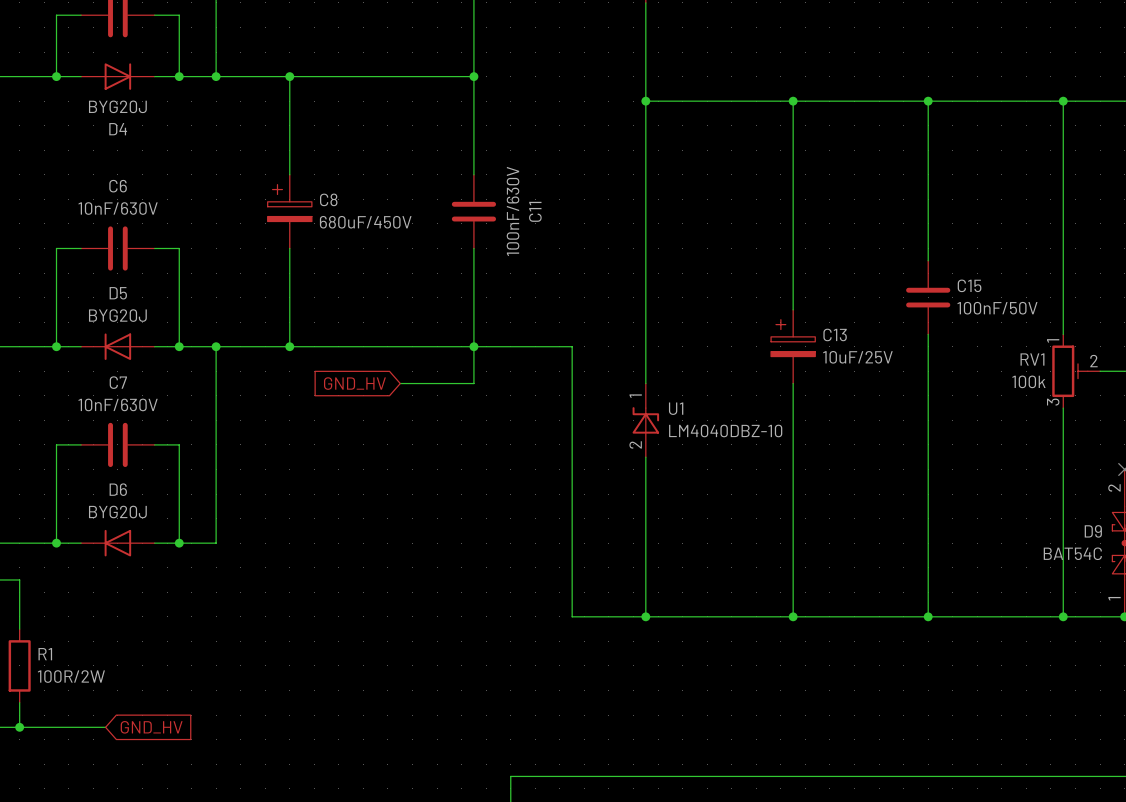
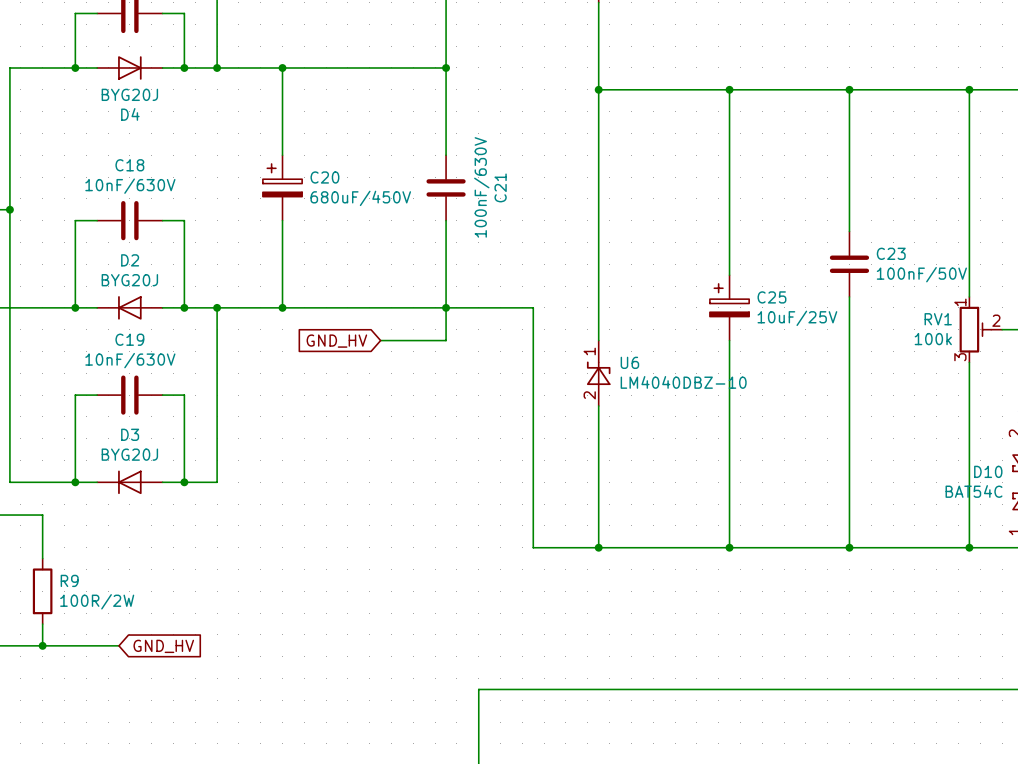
C6 name: C6 (118, 186) -> C18 (129, 165)
C8 name: C8 (328, 199) -> C20 (324, 177)
C11 name: C11 (535, 211) -> C21 (500, 187)
C15 name: C15 (969, 285) -> C23 (891, 253)
D5 name: D5 (118, 293) -> D2 (130, 260)
C13 name: C13 (835, 334) -> C25 (771, 297)
C7 name: C7 (118, 382) -> C19 (129, 339)
U1 name: U1 (676, 408) -> U6 (629, 362)
D6 name: D6 (118, 489) -> D3 (130, 434)
D9 name: D9 (1093, 531) -> D10 (988, 471)
R1 name: R1 (45, 654) -> R9 (69, 580)

